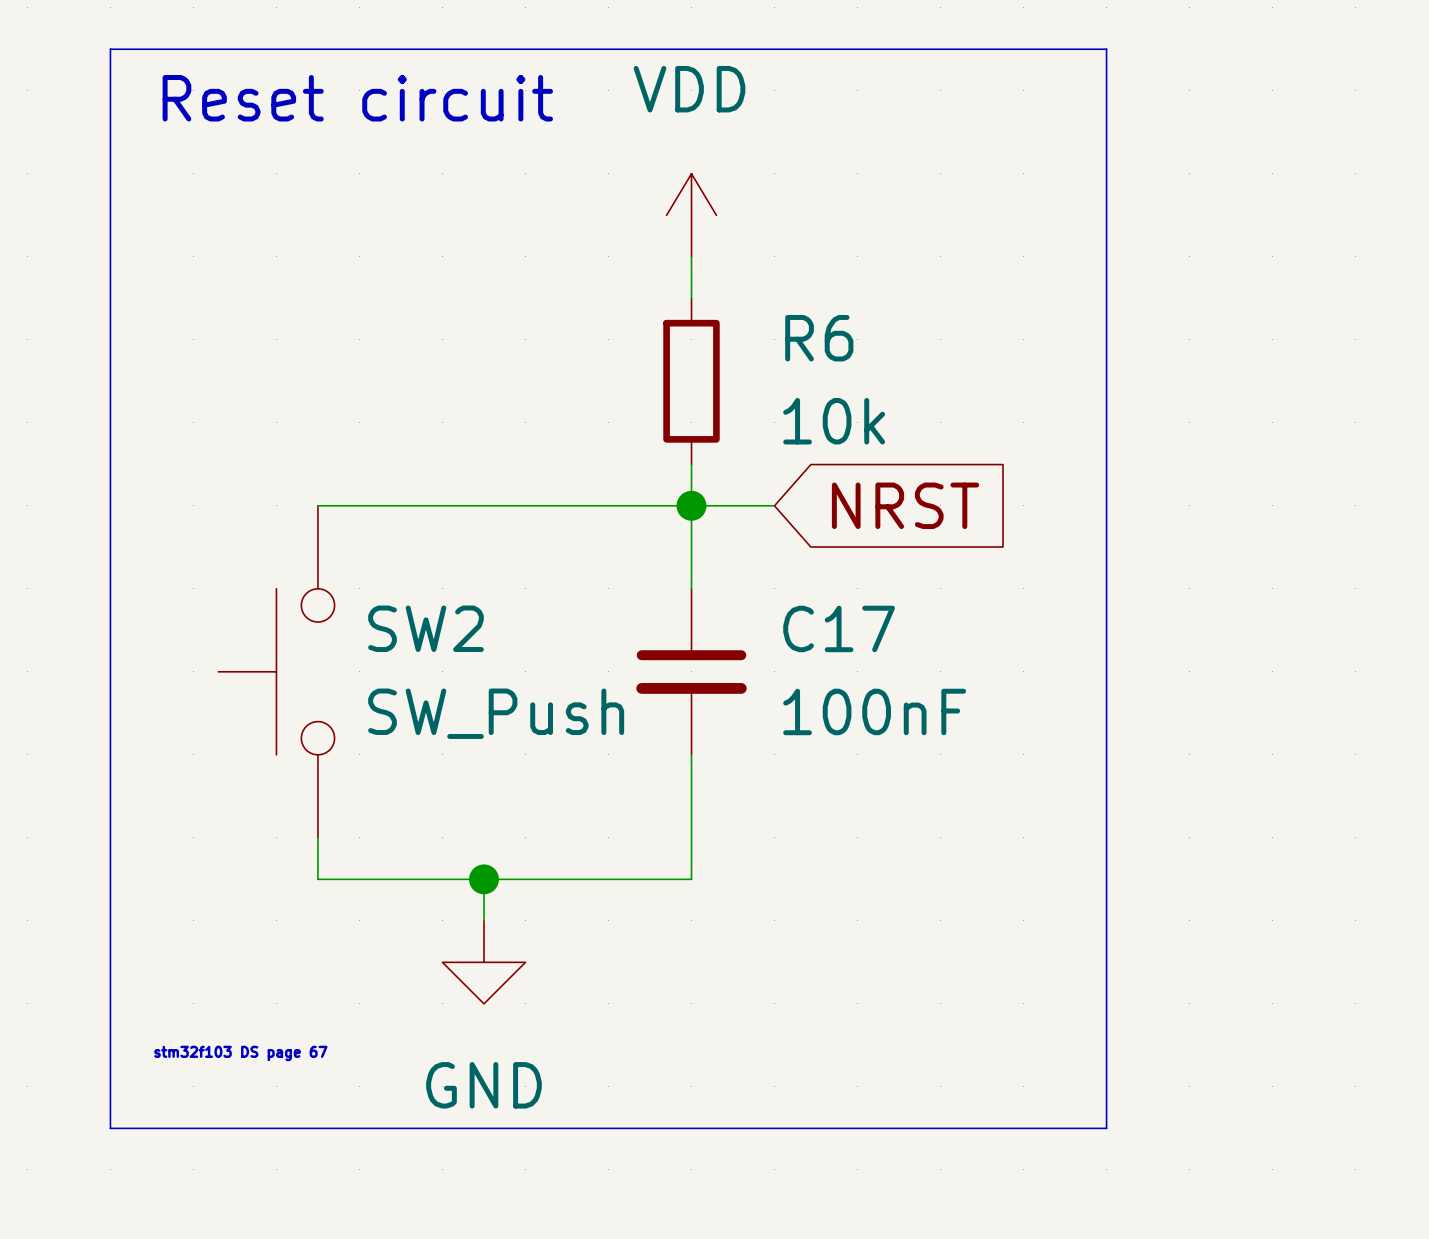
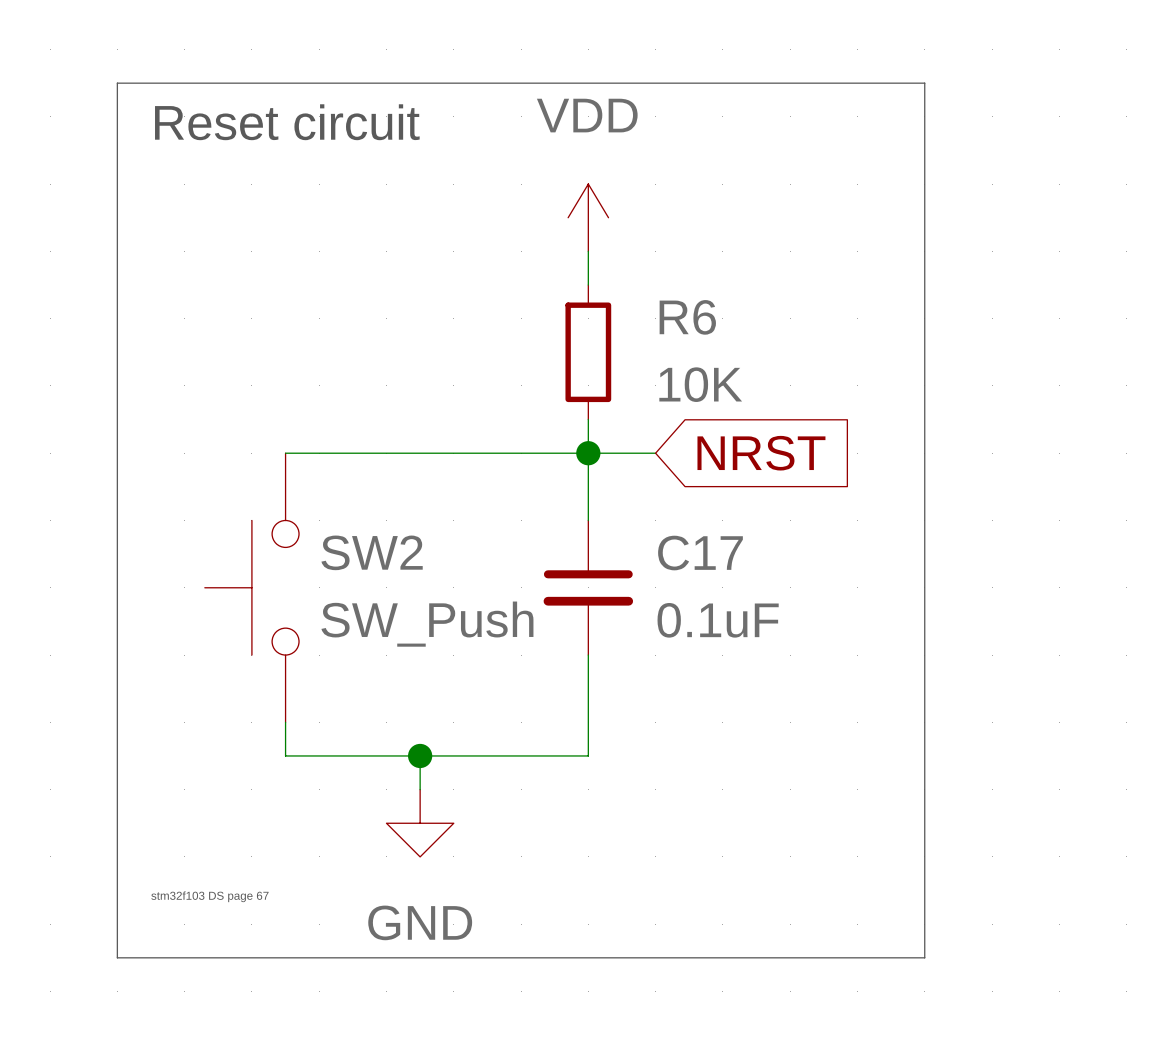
R6 value: 10k (834, 421) -> 10K (700, 384)
C17 value: 100nF (874, 711) -> 0.1uF (718, 620)

